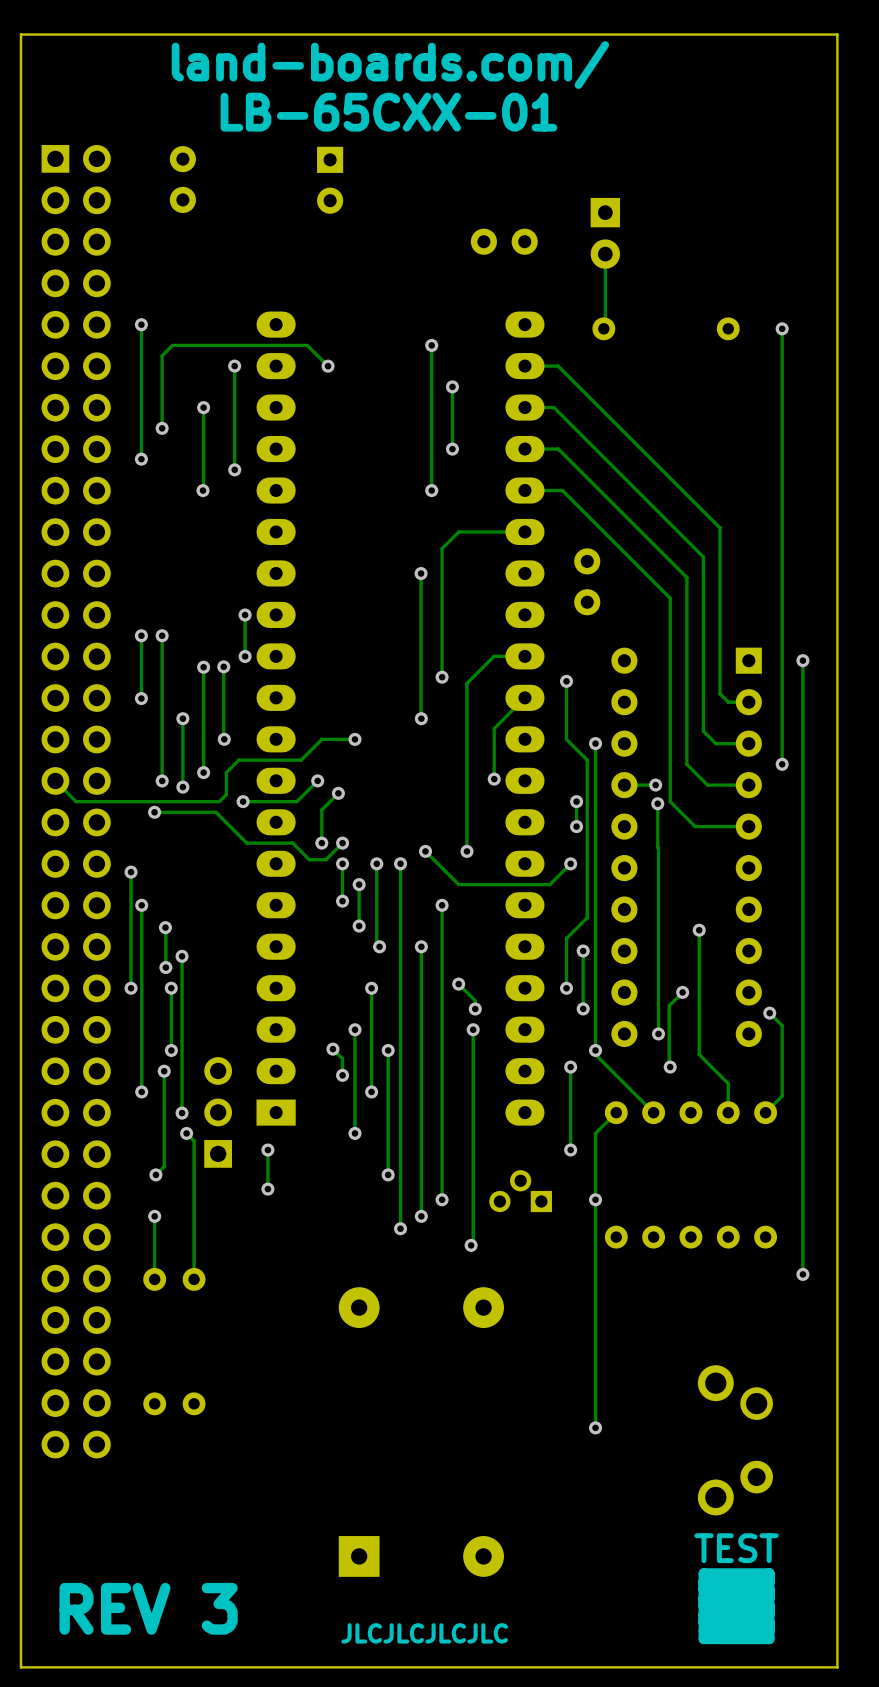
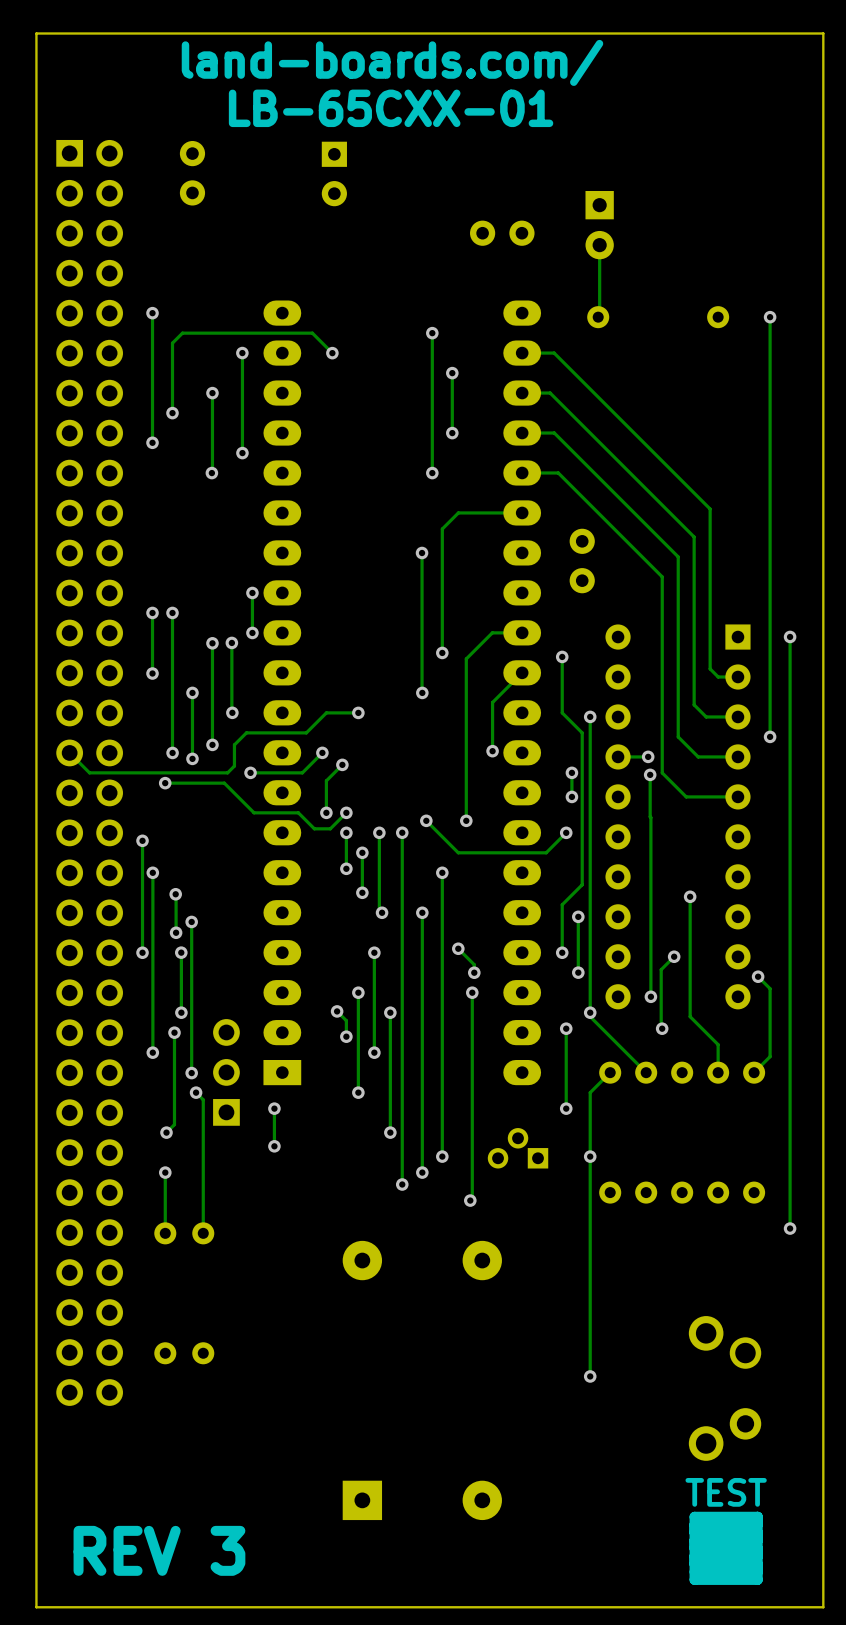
text: JLCJLCJLCJLC (424, 1633) -> none

